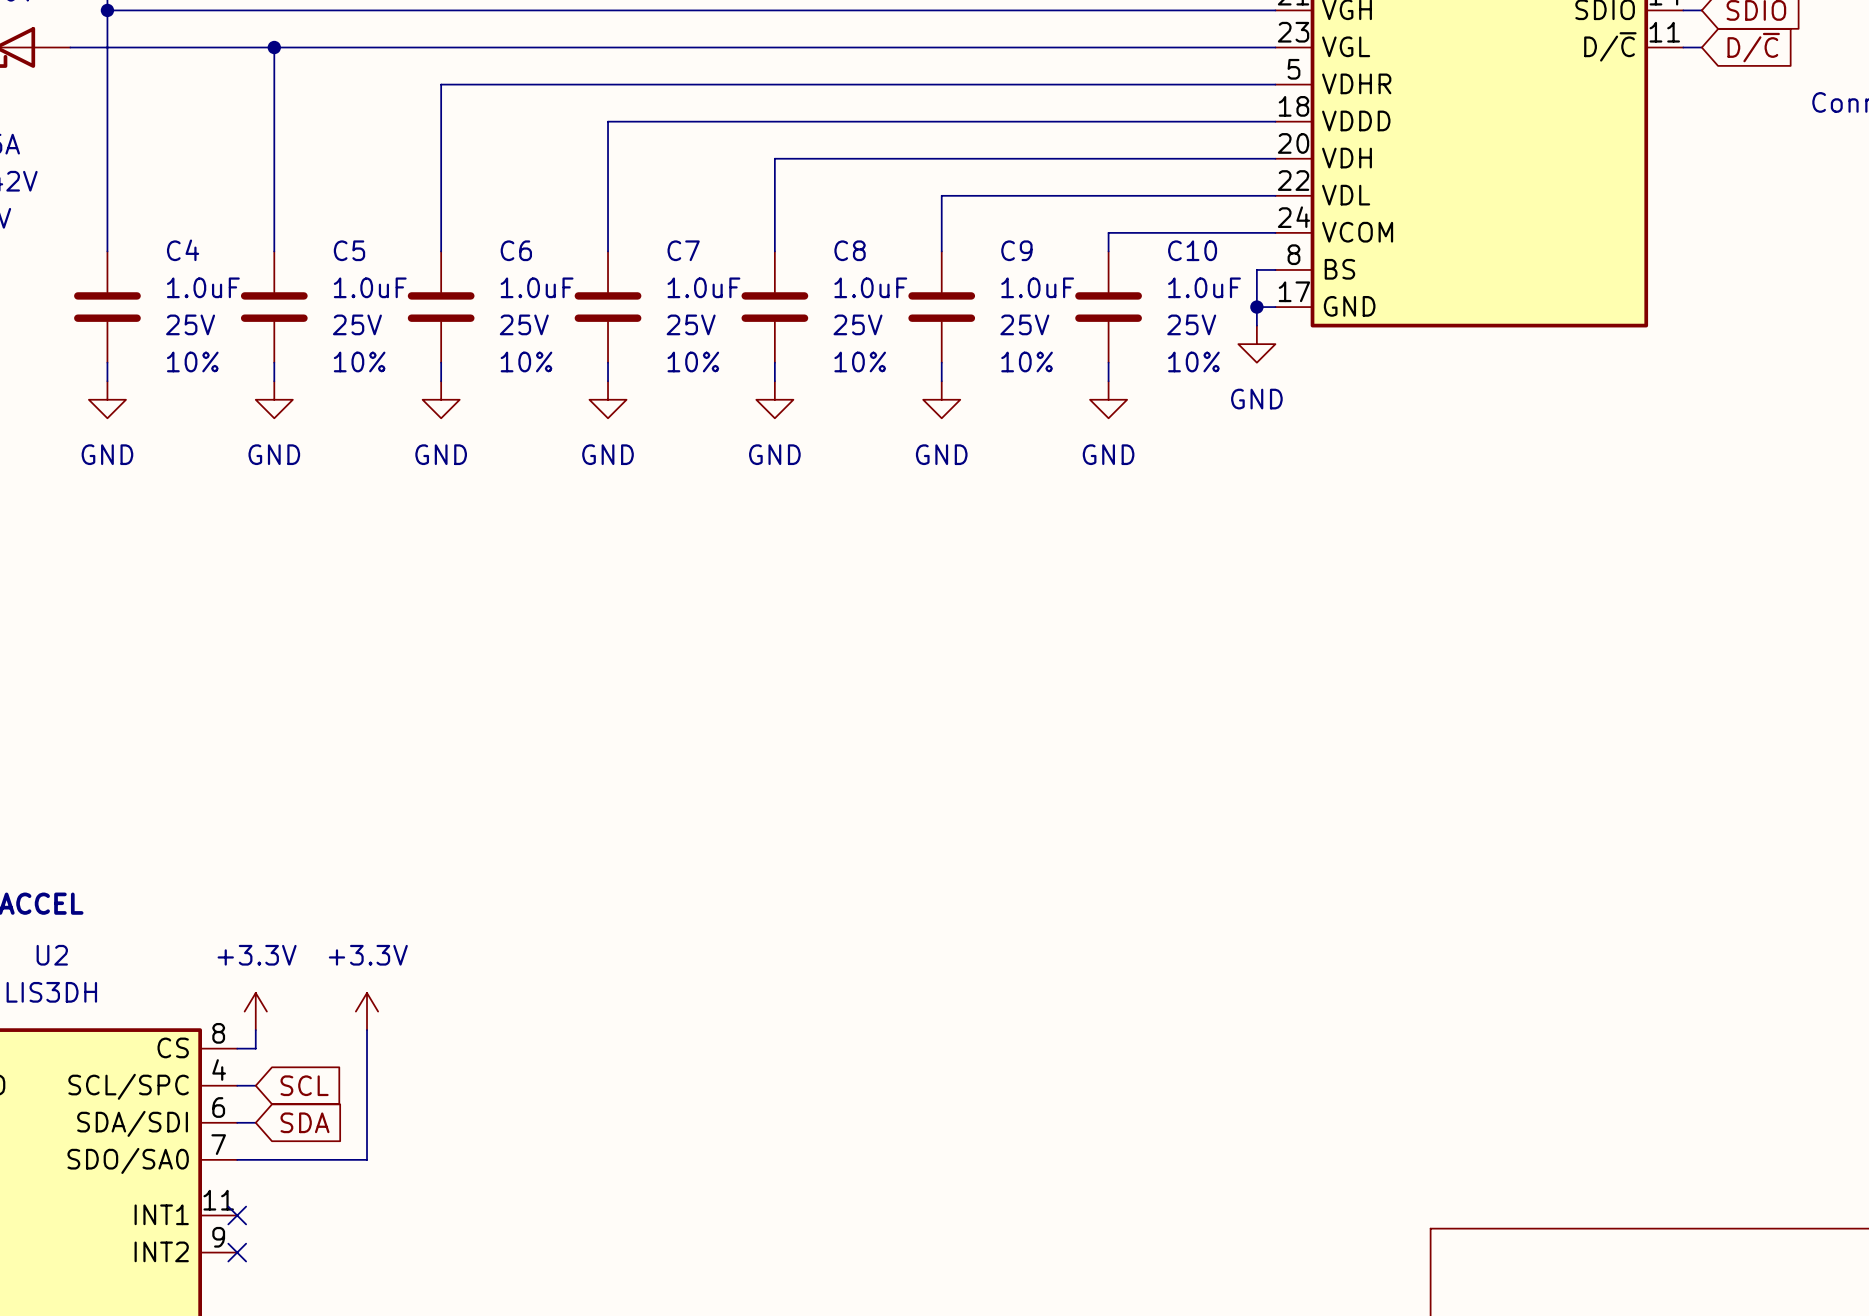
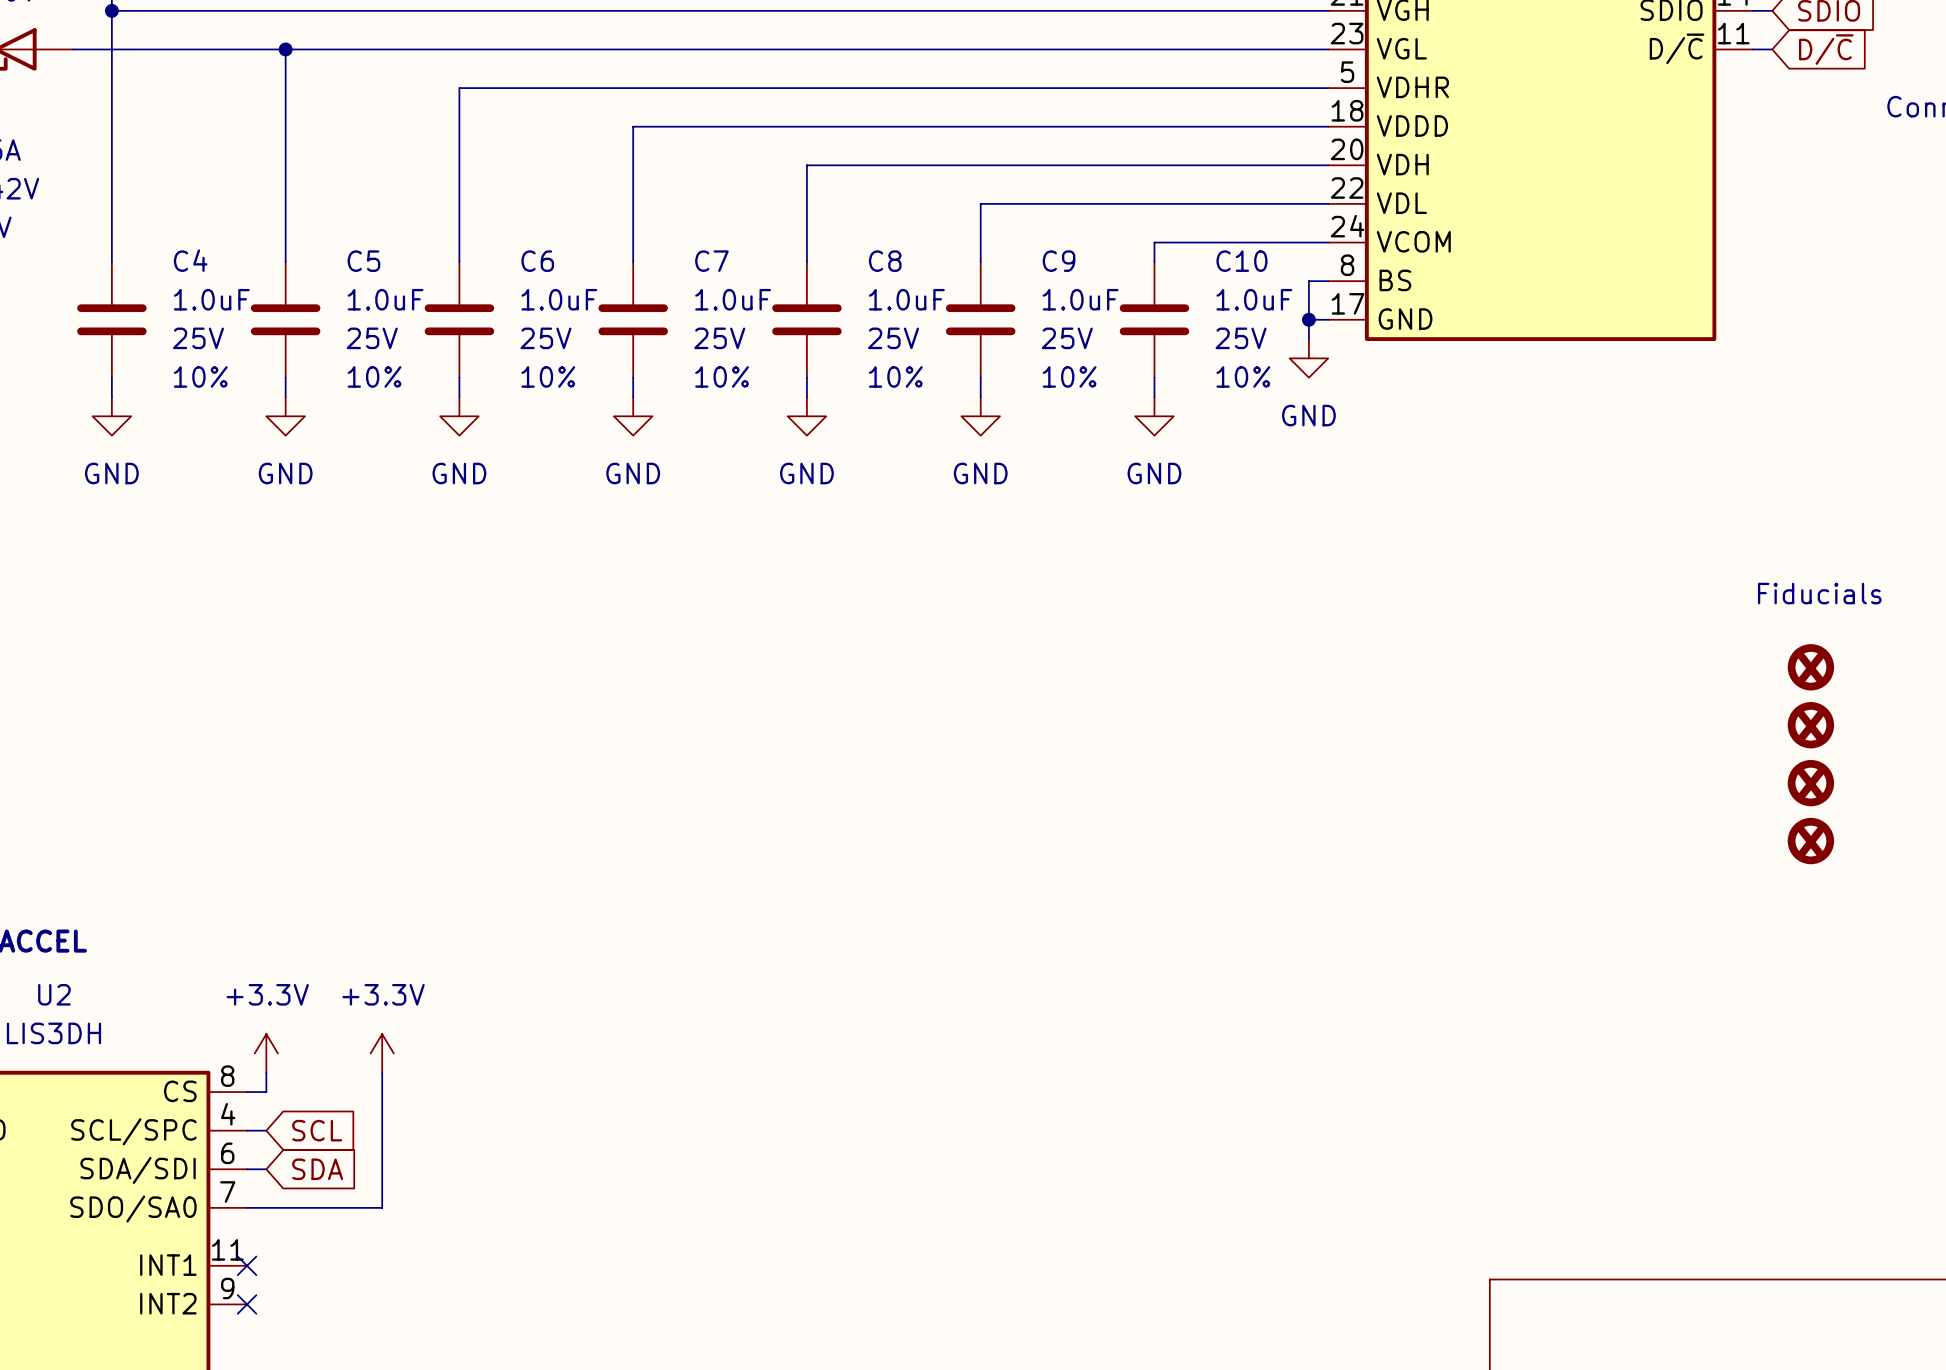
text: none -> Fiducials (1819, 593)
part: none -> (1810, 667)
part: none -> (1810, 725)
part: none -> (1810, 783)
part: none -> (1810, 841)

